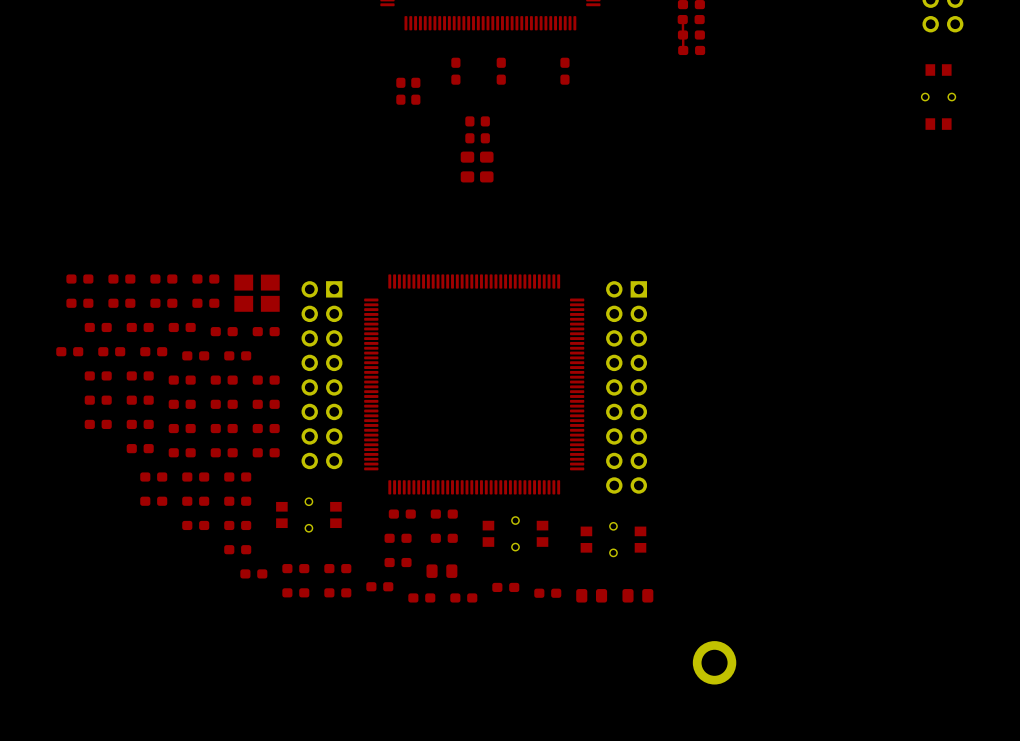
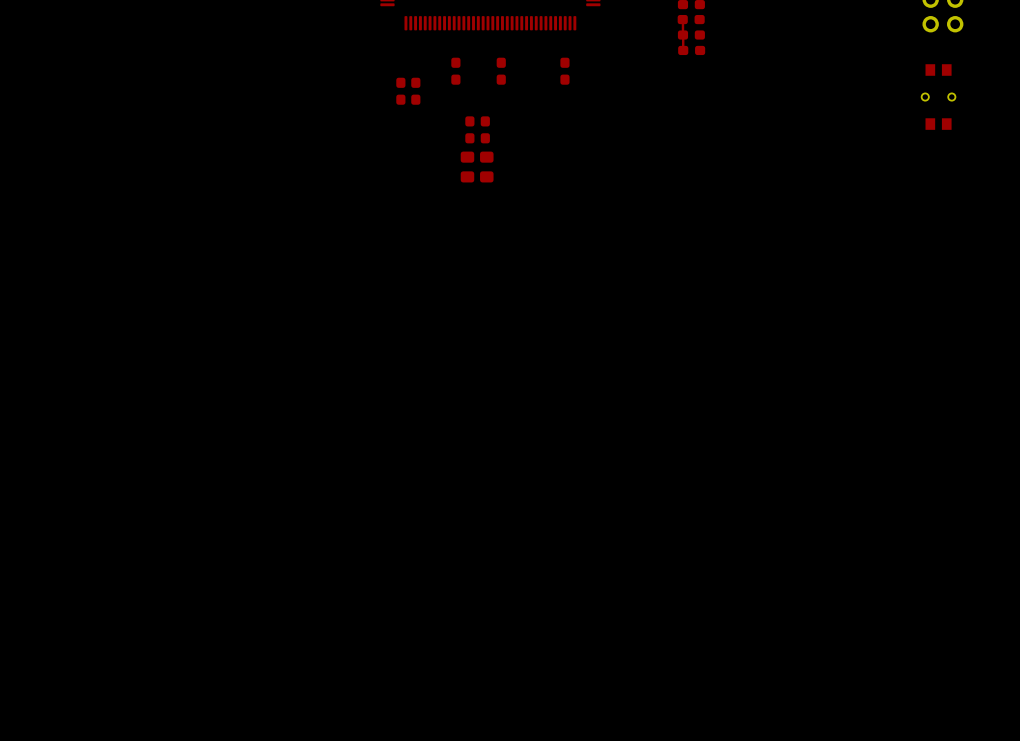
part: (79, 279) -> none
part: (121, 279) -> none
part: (163, 279) -> none
part: (205, 279) -> none
part: (257, 293) -> none
part: (79, 303) -> none
part: (121, 303) -> none
part: (163, 303) -> none
part: (205, 303) -> none
part: (98, 327) -> none
part: (140, 327) -> none
part: (182, 327) -> none
part: (224, 331) -> none
part: (266, 331) -> none
part: (69, 351) -> none
part: (111, 351) -> none
part: (153, 351) -> none
part: (195, 355) -> none
part: (237, 355) -> none
part: (98, 375) -> none
part: (140, 375) -> none
part: (321, 375) -> none
part: (182, 380) -> none
part: (224, 380) -> none
part: (266, 380) -> none
part: (474, 384) -> none
part: (626, 387) -> none
part: (98, 400) -> none
part: (140, 400) -> none
part: (182, 404) -> none
part: (224, 404) -> none
part: (266, 404) -> none
part: (98, 424) -> none
part: (140, 424) -> none
part: (182, 428) -> none
part: (224, 428) -> none
part: (266, 428) -> none
part: (140, 448) -> none
part: (182, 452) -> none
part: (224, 452) -> none
part: (266, 452) -> none
part: (153, 477) -> none
part: (195, 477) -> none
part: (237, 477) -> none
part: (153, 501) -> none
part: (195, 501) -> none
part: (237, 501) -> none
part: (308, 514) -> none
part: (402, 514) -> none
part: (444, 514) -> none
part: (195, 525) -> none
part: (237, 525) -> none
part: (515, 533) -> none
part: (398, 538) -> none
part: (444, 538) -> none
part: (613, 539) -> none
part: (237, 549) -> none
part: (398, 562) -> none
part: (295, 568) -> none
part: (337, 568) -> none
part: (441, 571) -> none
part: (253, 573) -> none
part: (379, 586) -> none
part: (505, 587) -> none
part: (295, 592) -> none
part: (337, 592) -> none
part: (547, 593) -> none
part: (591, 595) -> none
part: (637, 595) -> none
part: (421, 597) -> none
part: (463, 597) -> none
part: (714, 662) -> none

